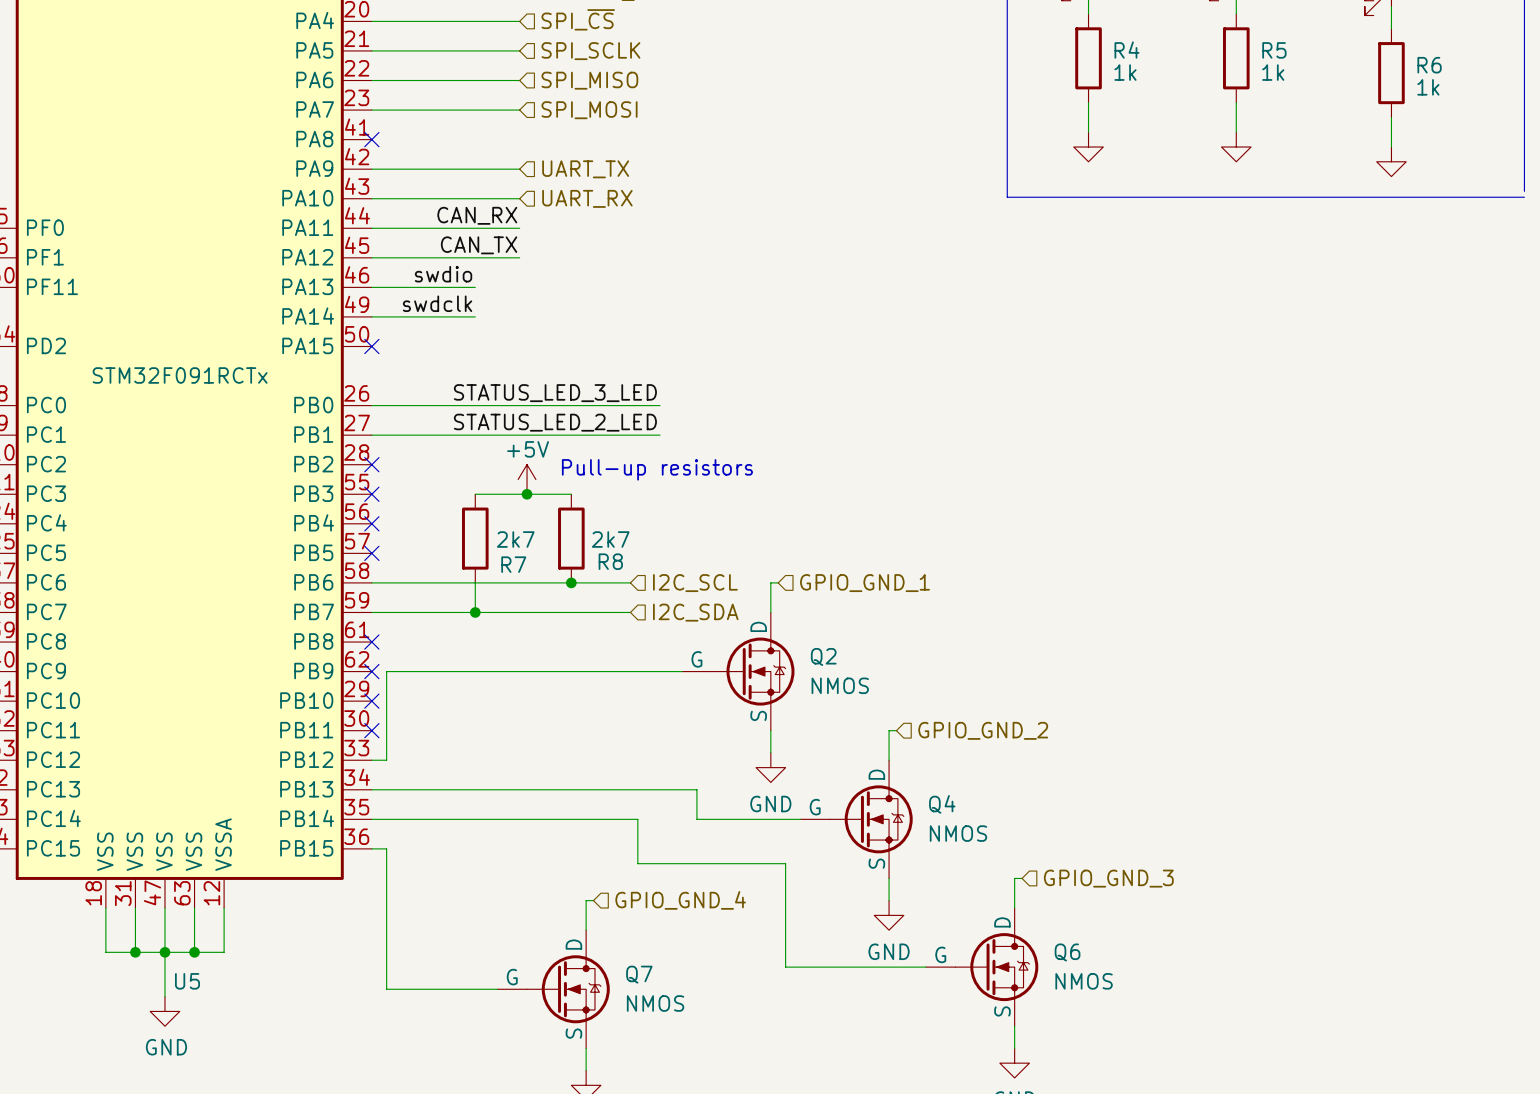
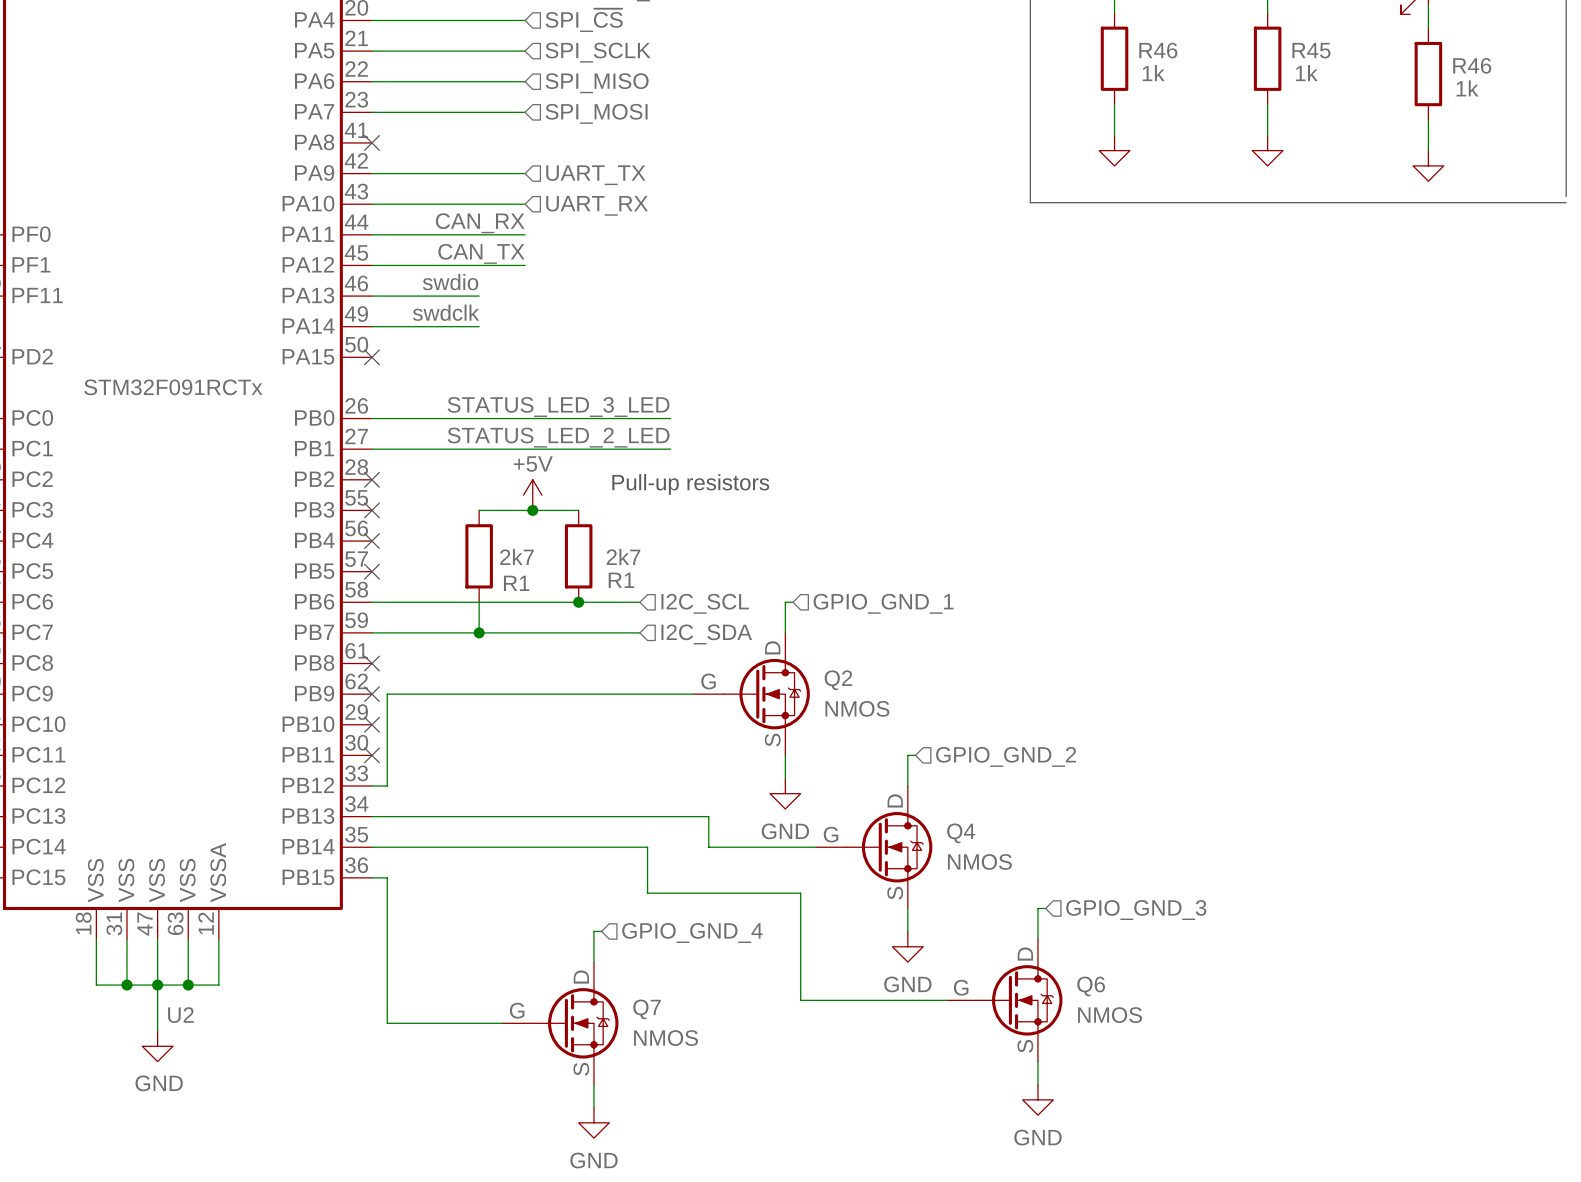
R4 name: R4 (1126, 50) -> R46 (1158, 50)
R5 name: R5 (1274, 50) -> R45 (1311, 50)
R6 name: R6 (1429, 65) -> R46 (1472, 65)
R8 name: R8 (610, 561) -> R1 (621, 580)
R7 name: R7 (513, 564) -> R1 (516, 583)
U5 name: U5 (187, 981) -> U2 (180, 1015)

